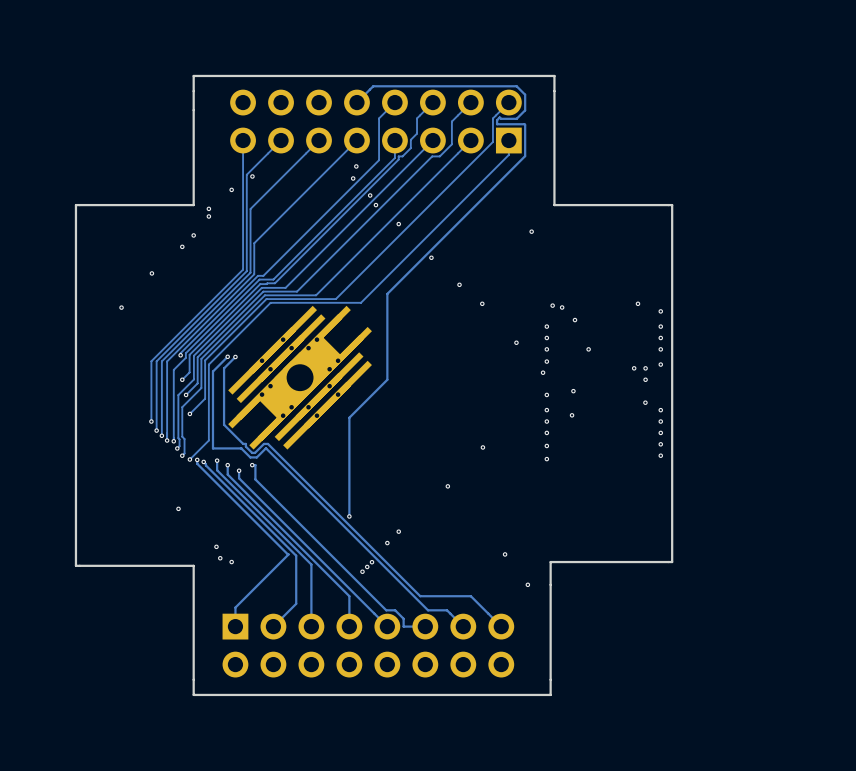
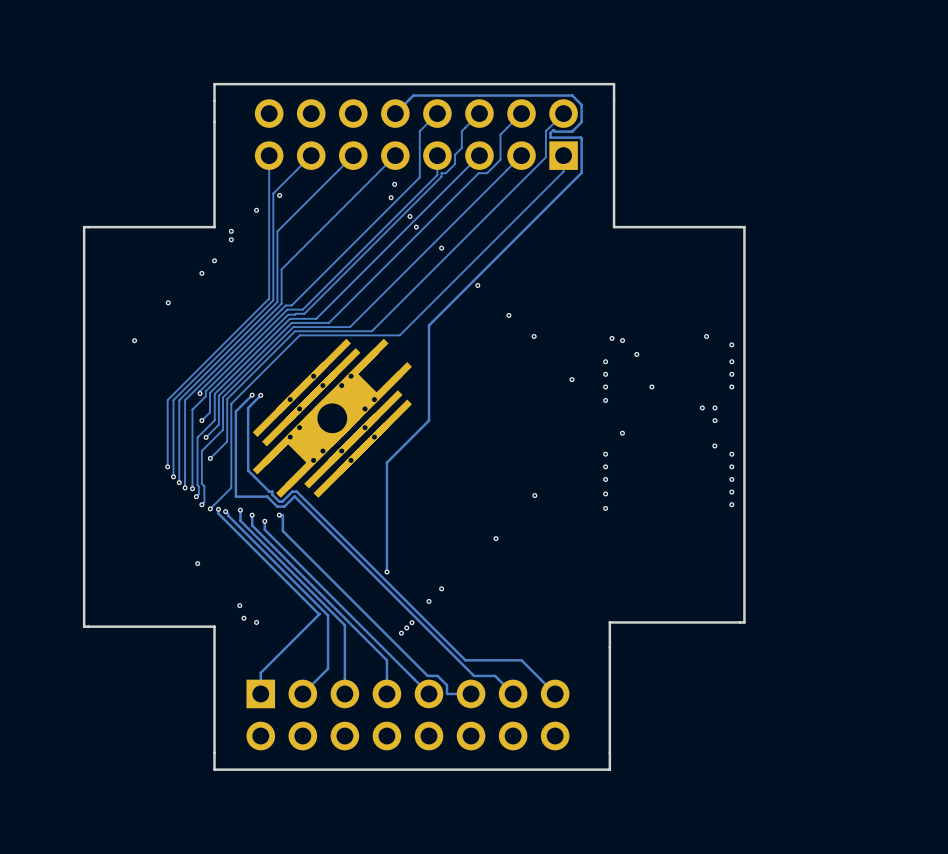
via: (531, 231) -> none
via: (660, 364) -> none
via: (543, 372) -> none
via: none -> (622, 433)
via: (573, 391) -> none
via: (546, 394) -> none
via: (572, 415) -> none
via: (505, 554) -> none
via: (527, 584) -> none

